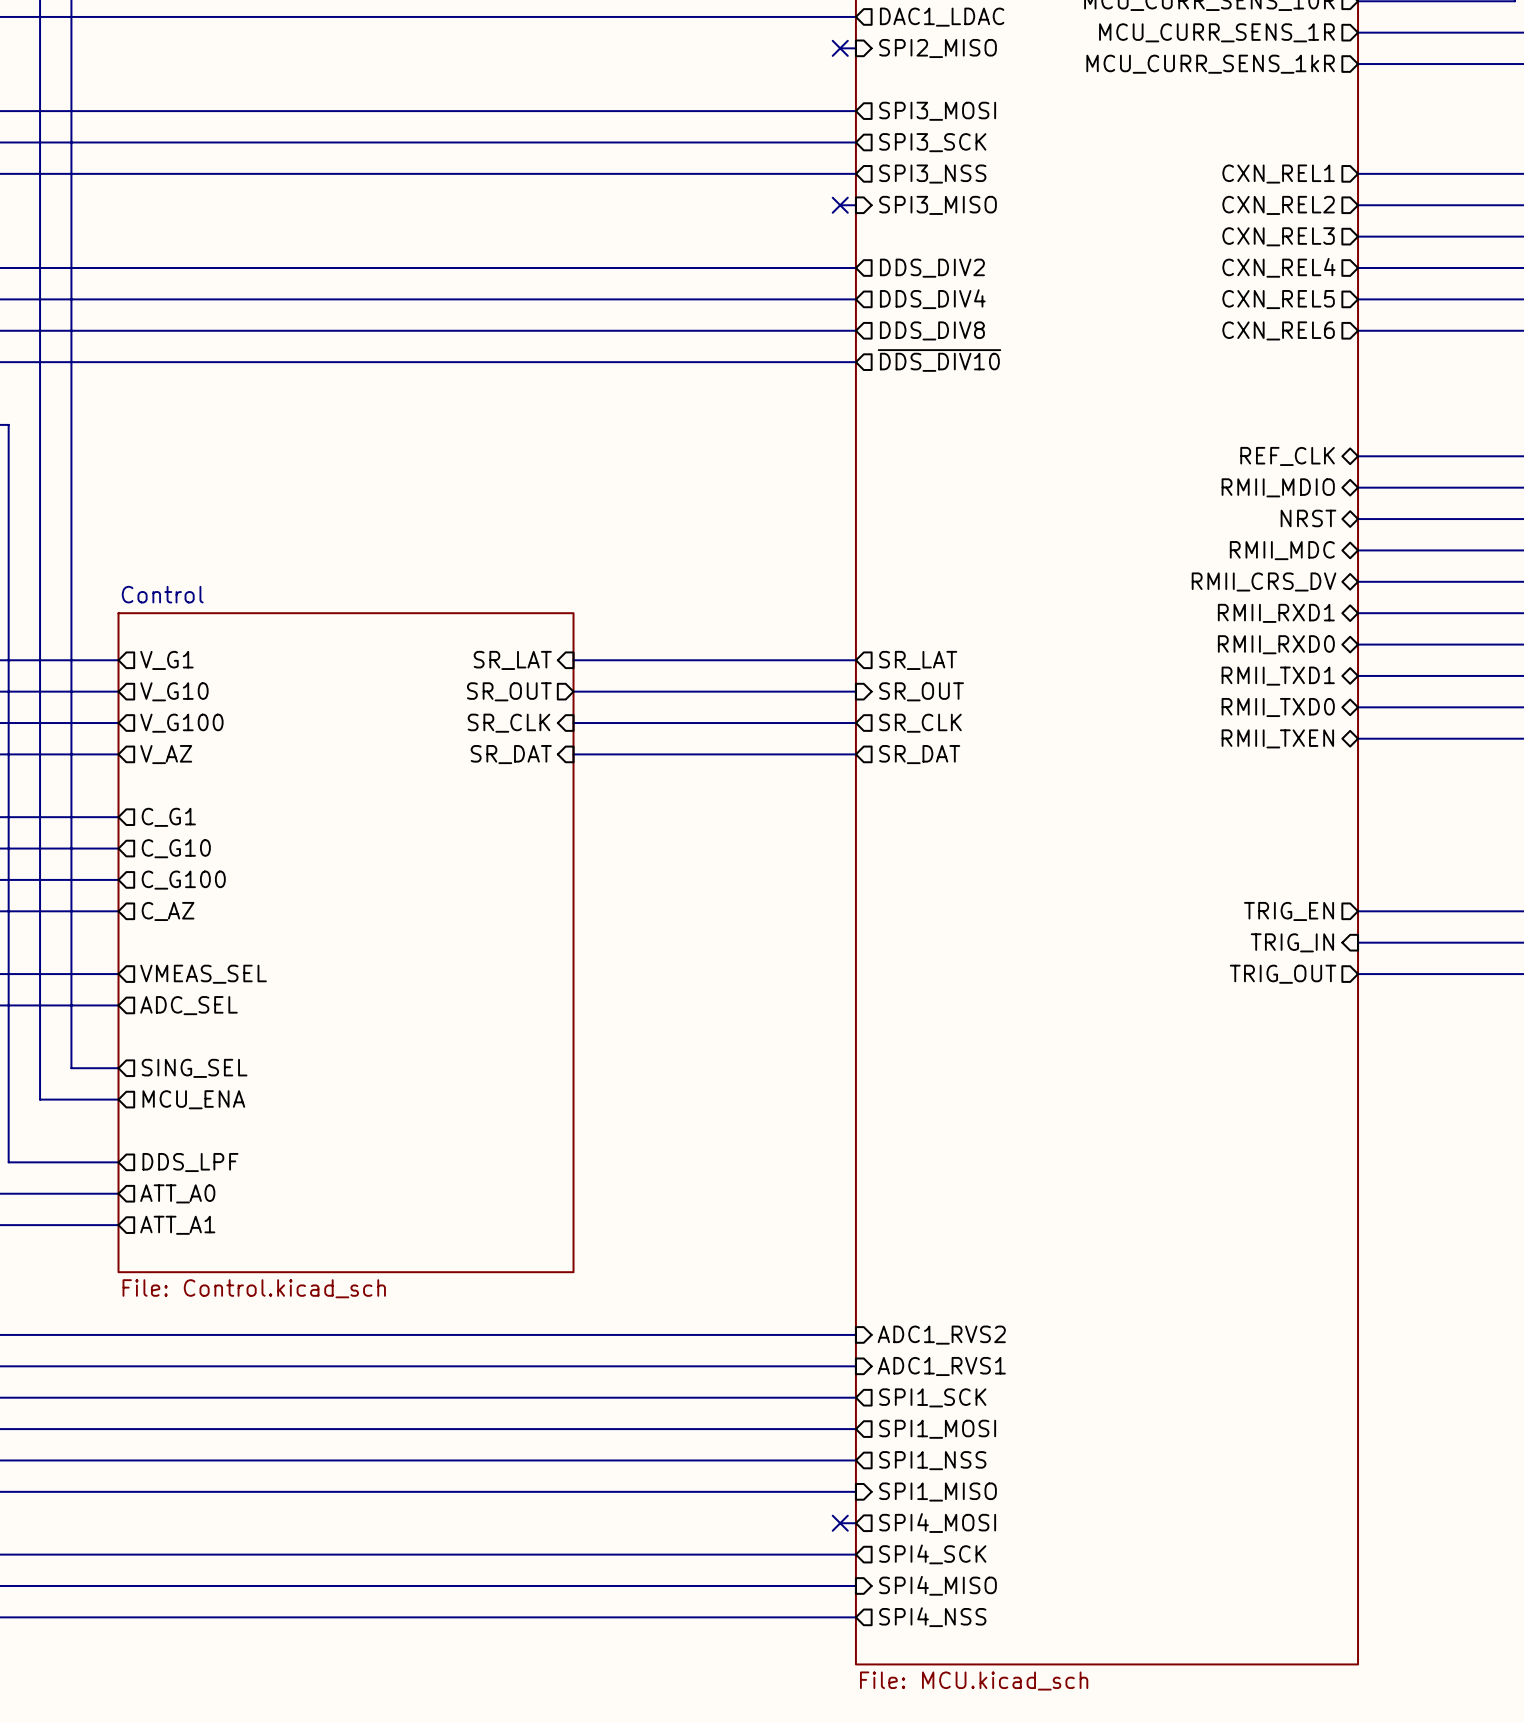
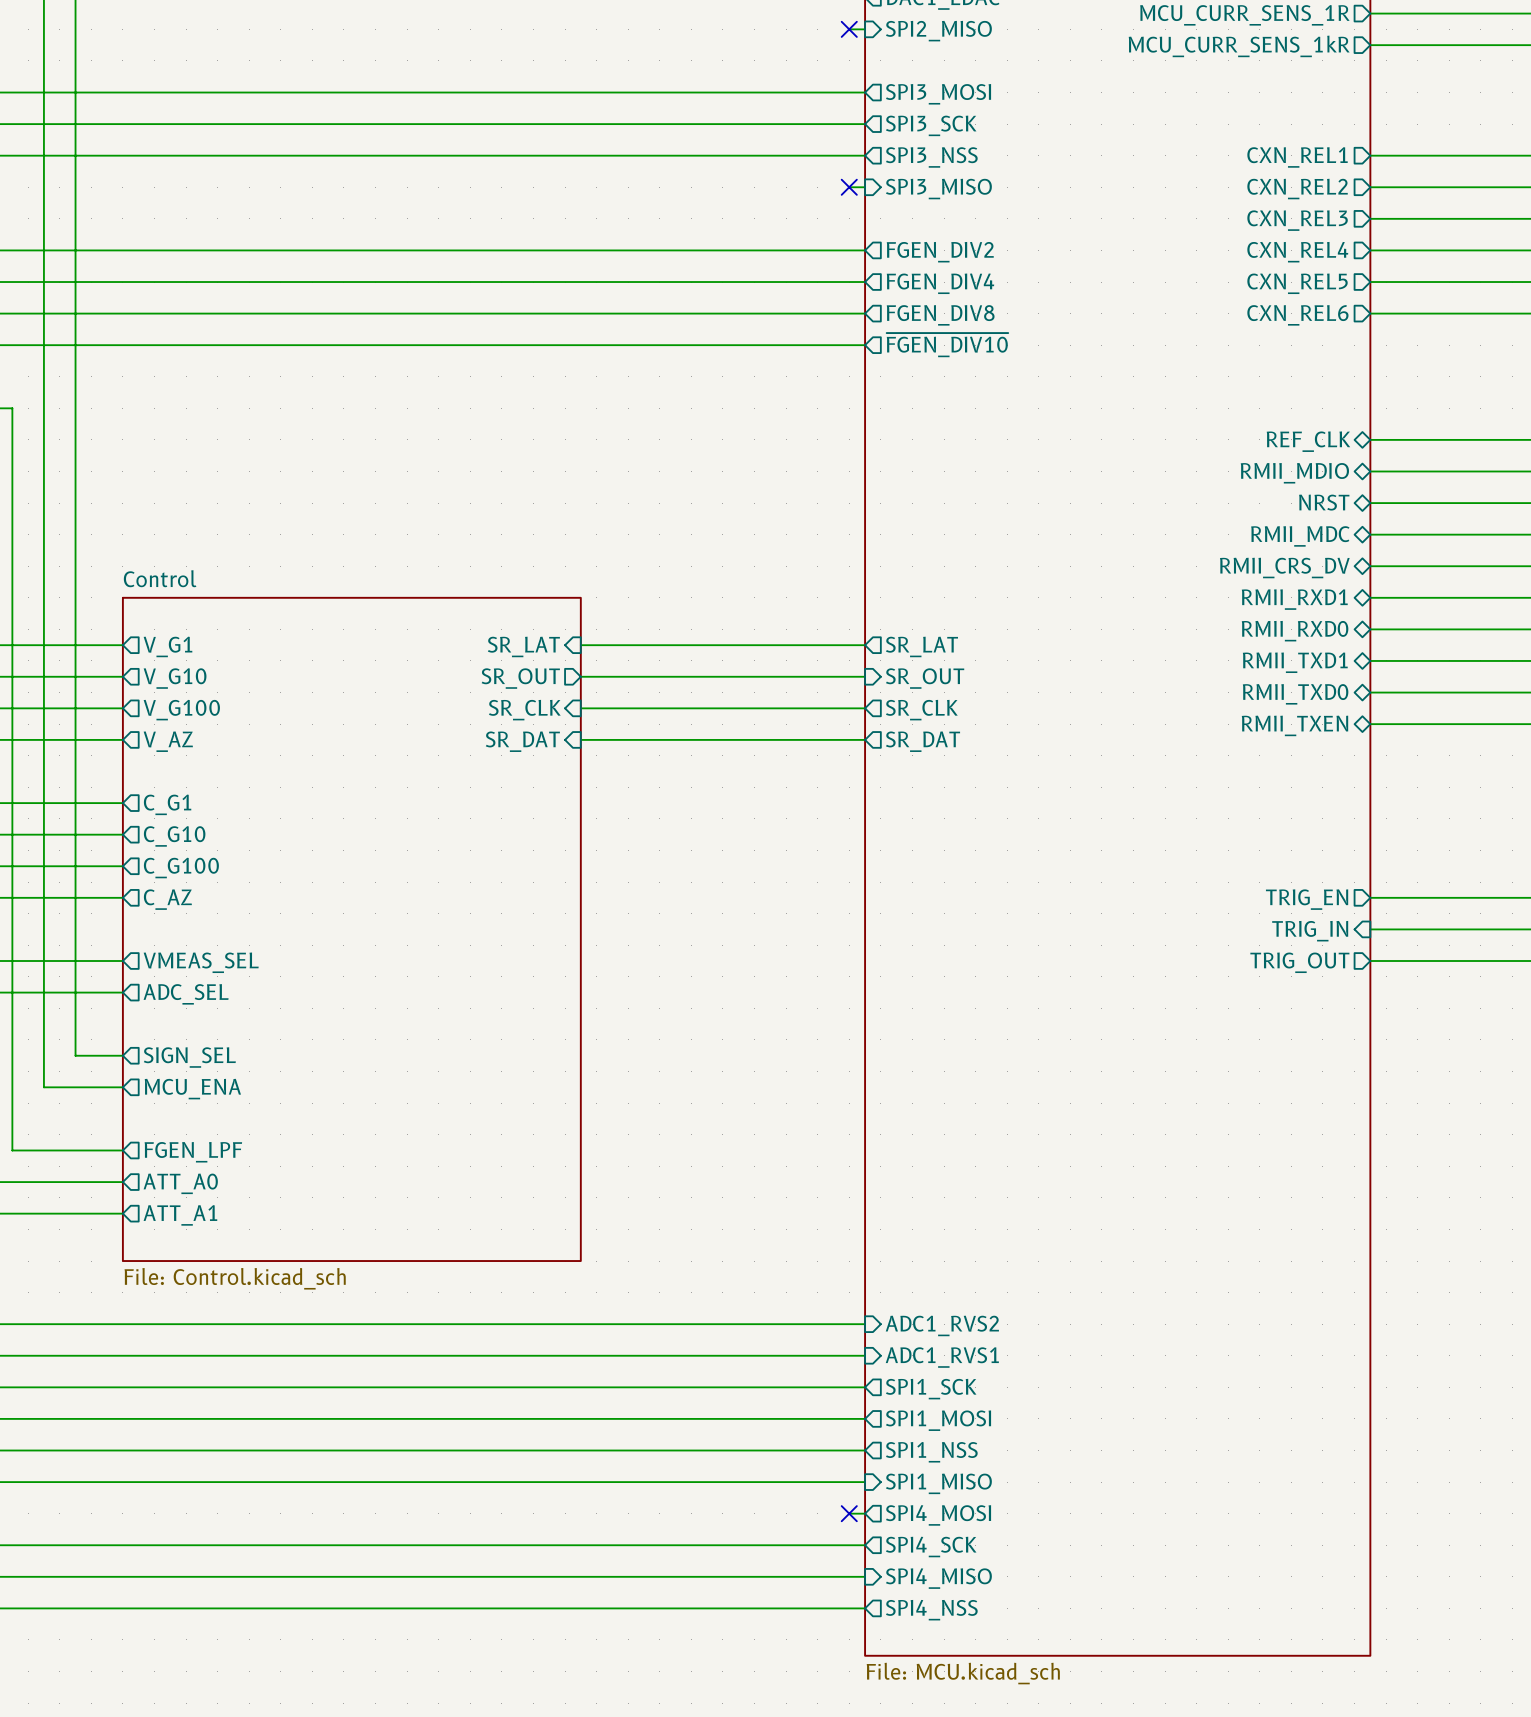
sheet pin: DDS_DIV2 (932, 268) -> FGEN_DIV2 (940, 252)
sheet pin: DDS_DIV4 (932, 299) -> FGEN_DIV4 (940, 283)
sheet pin: DDS_DIV8 (932, 330) -> FGEN_DIV8 (940, 315)
sheet pin: ~{DDS_DIV10} (939, 360) -> ~{FGEN_DIV10} (947, 345)
sheet pin: SING_SEL (194, 1068) -> SIGN_SEL (189, 1057)
sheet pin: DDS_LPF (190, 1162) -> FGEN_LPF (193, 1152)

